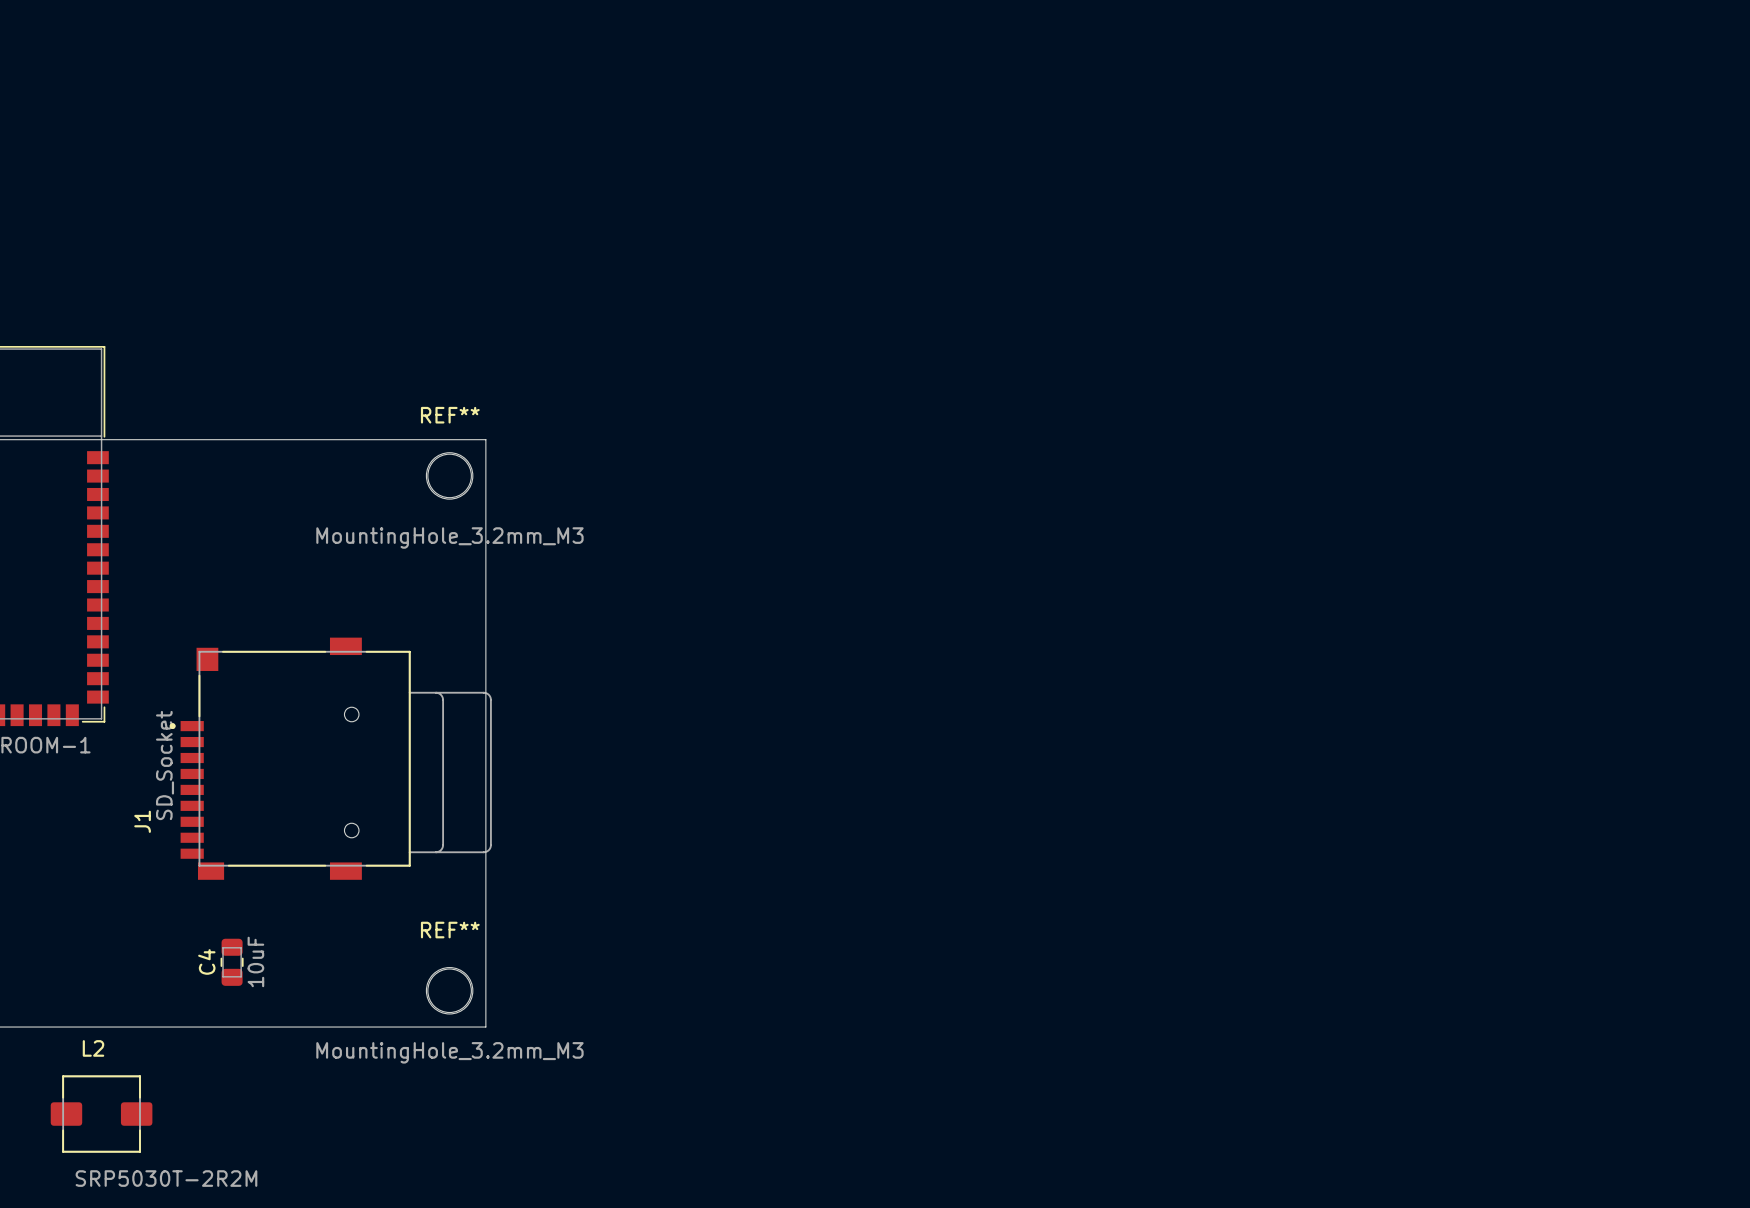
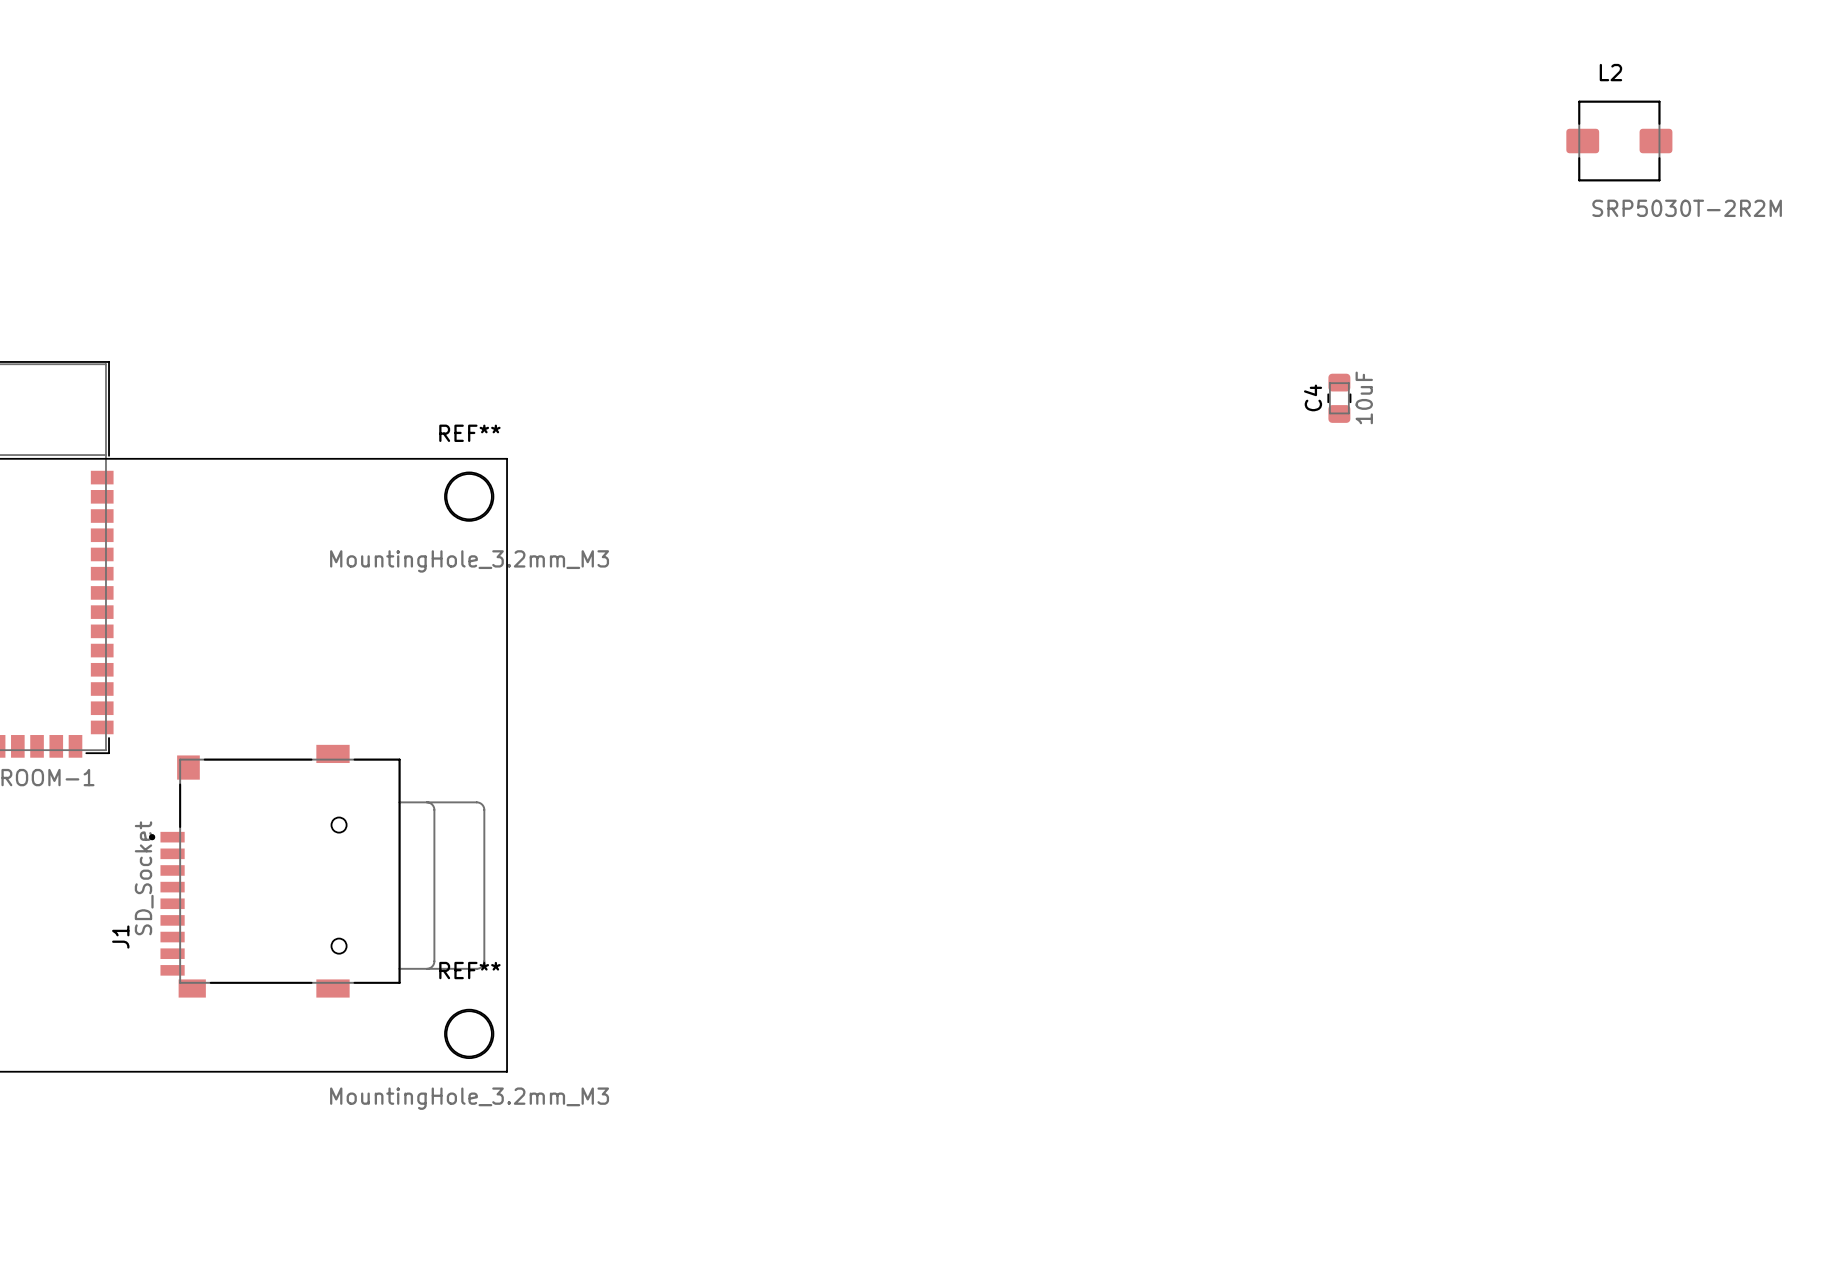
J1 position: (330, 758) -> (317, 871)
C4 position: (232, 962) -> (1339, 398)
L2 position: (101, 1114) -> (1619, 141)

